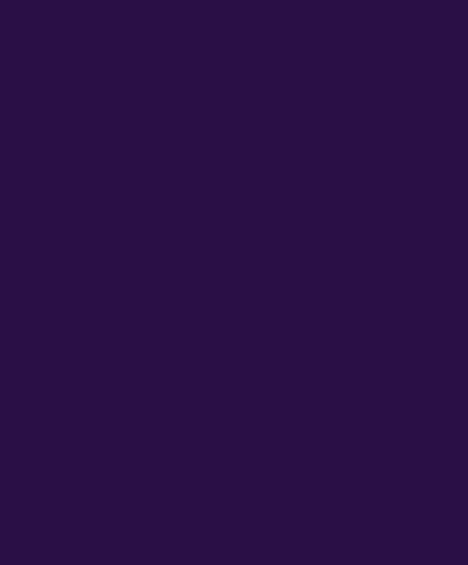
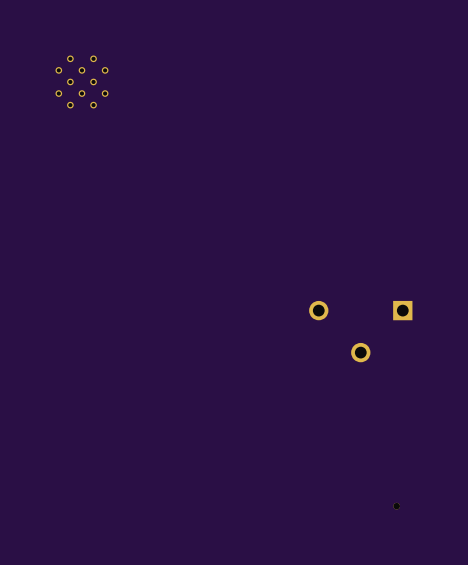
part: none -> (81, 81)
part: none -> (360, 331)
part: none -> (396, 506)

